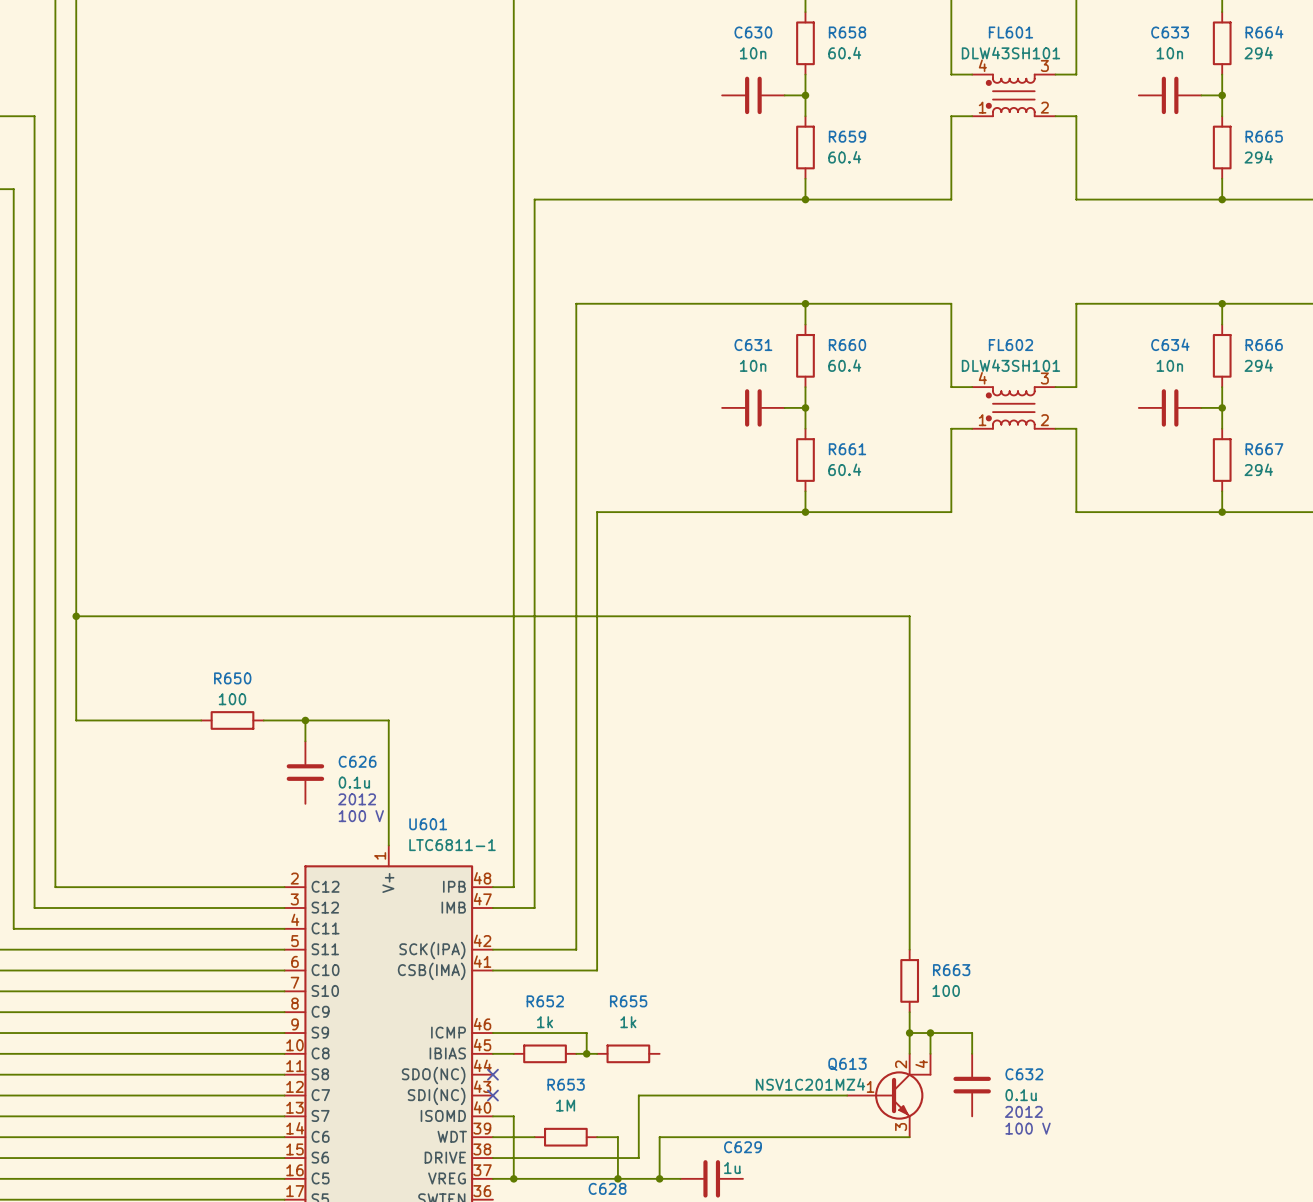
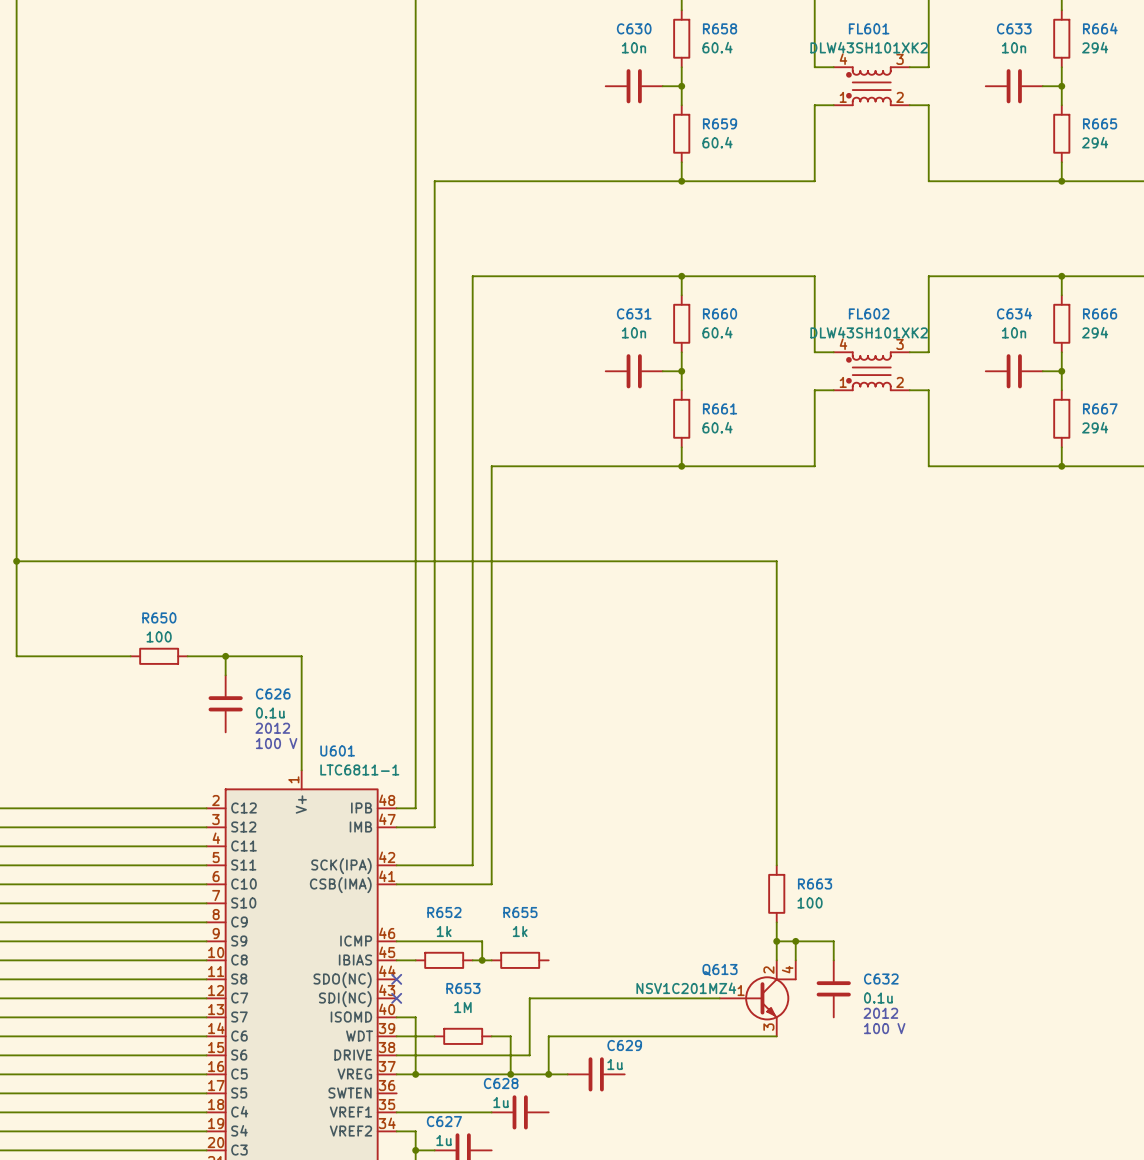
FL601 value: DLW43SH101 (1010, 53) -> DLW43SH101XK2 (869, 47)
FL602 value: DLW43SH101 (1010, 365) -> DLW43SH101XK2 (869, 332)

